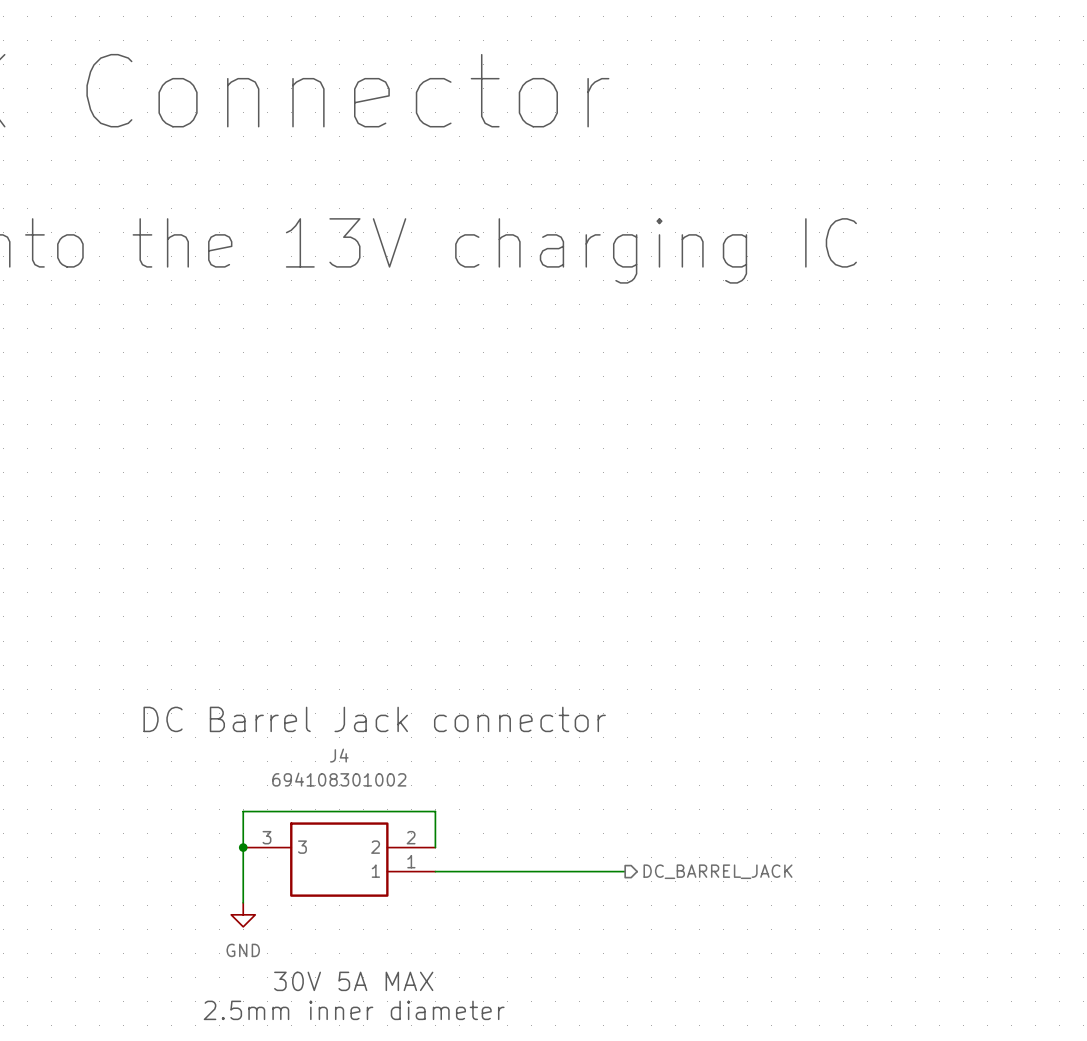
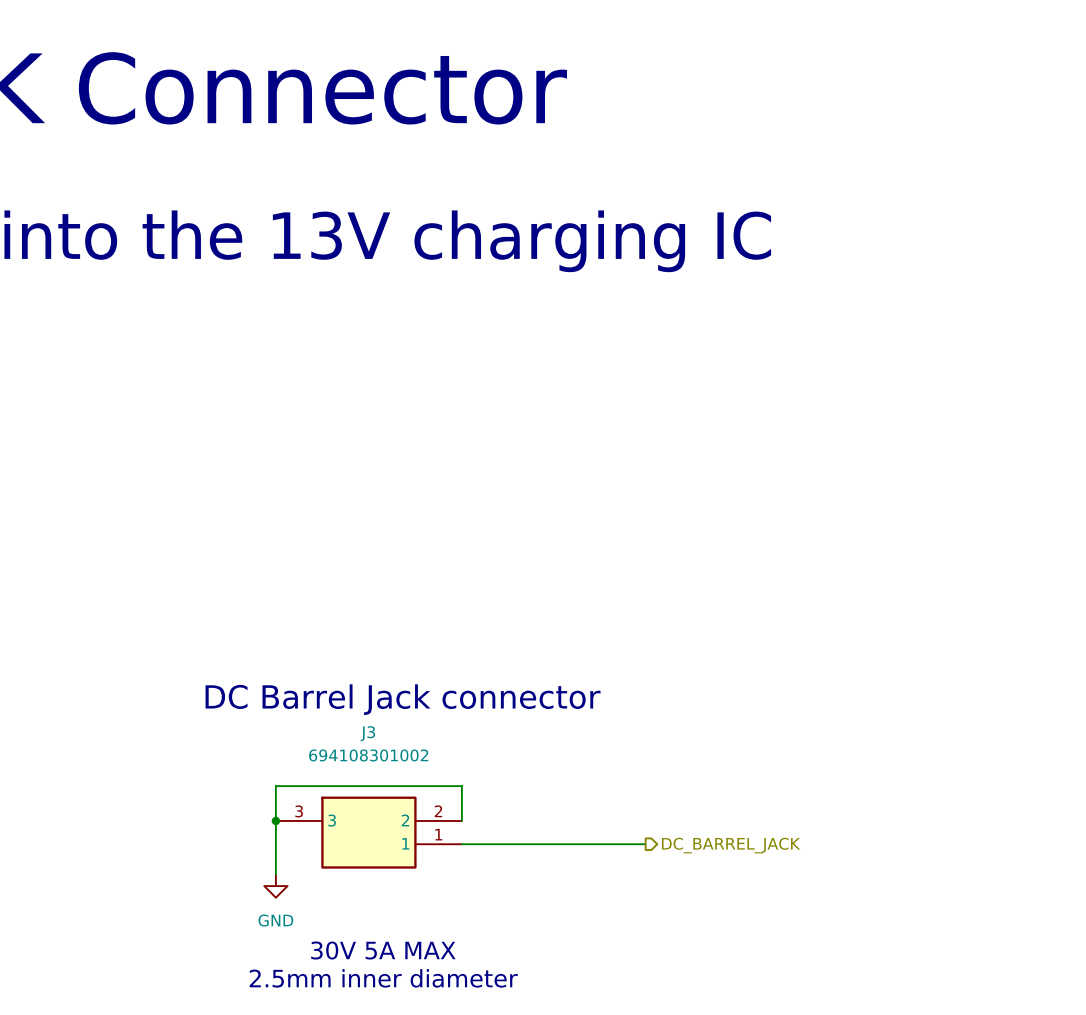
J4 name: J4 (339, 755) -> J3 (367, 733)

